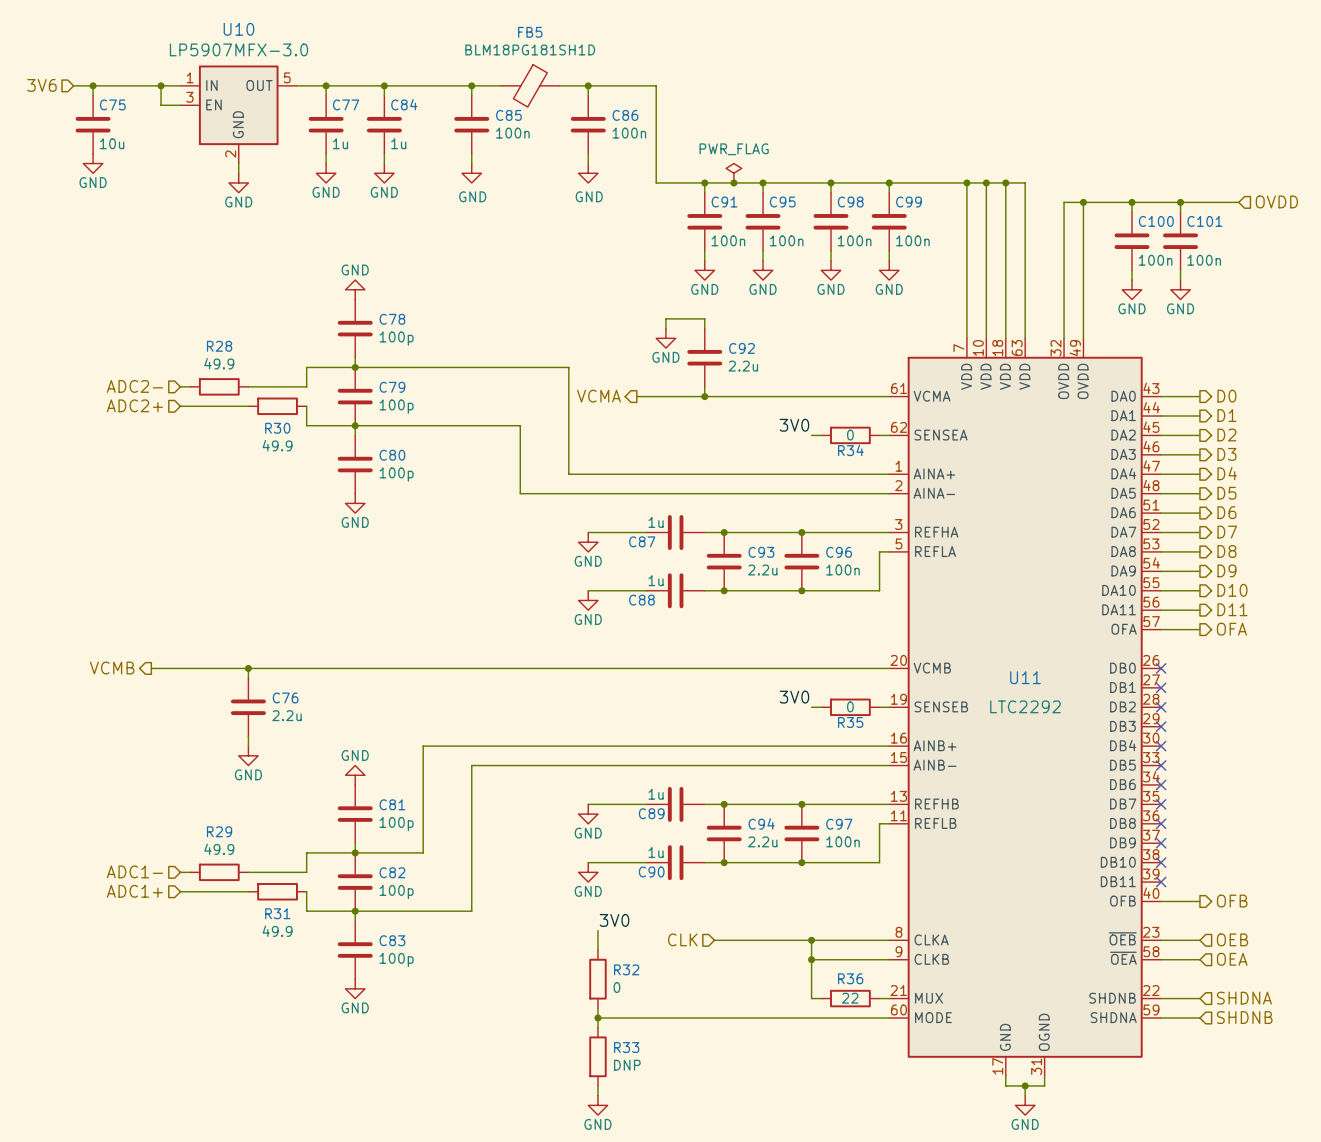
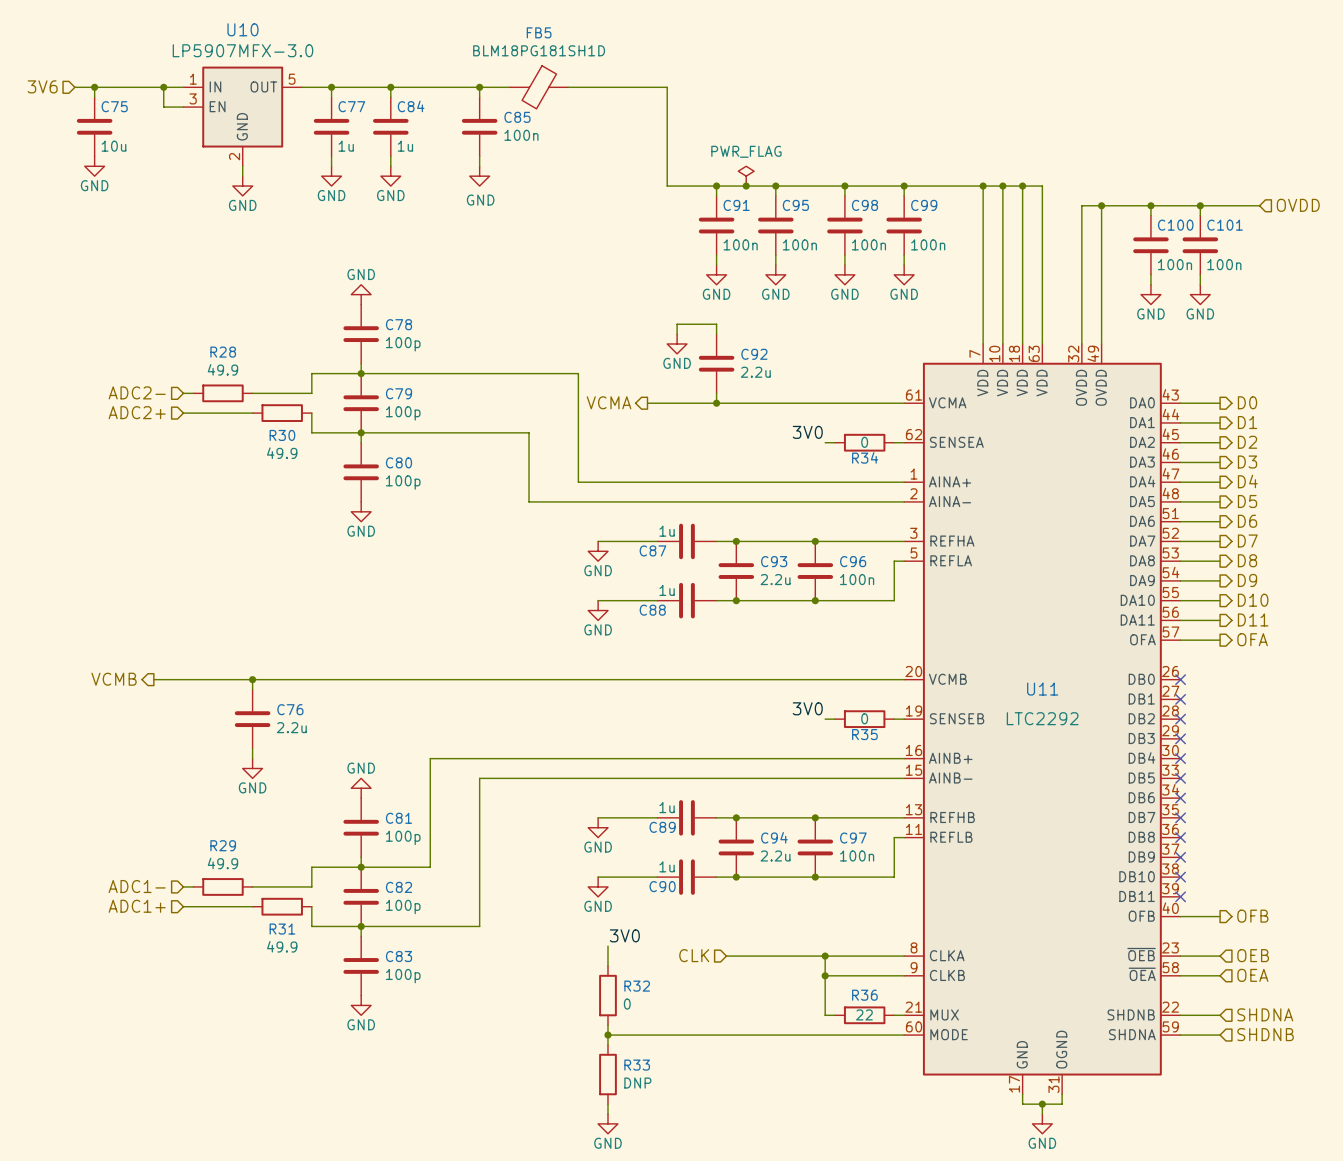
wire: (588, 85) (588, 95) -> none
junction: (588, 85) -> none
C86: 100n (588, 124) -> none
wire: (588, 153) (588, 163) -> none
power symbol: GND (588, 173) -> none

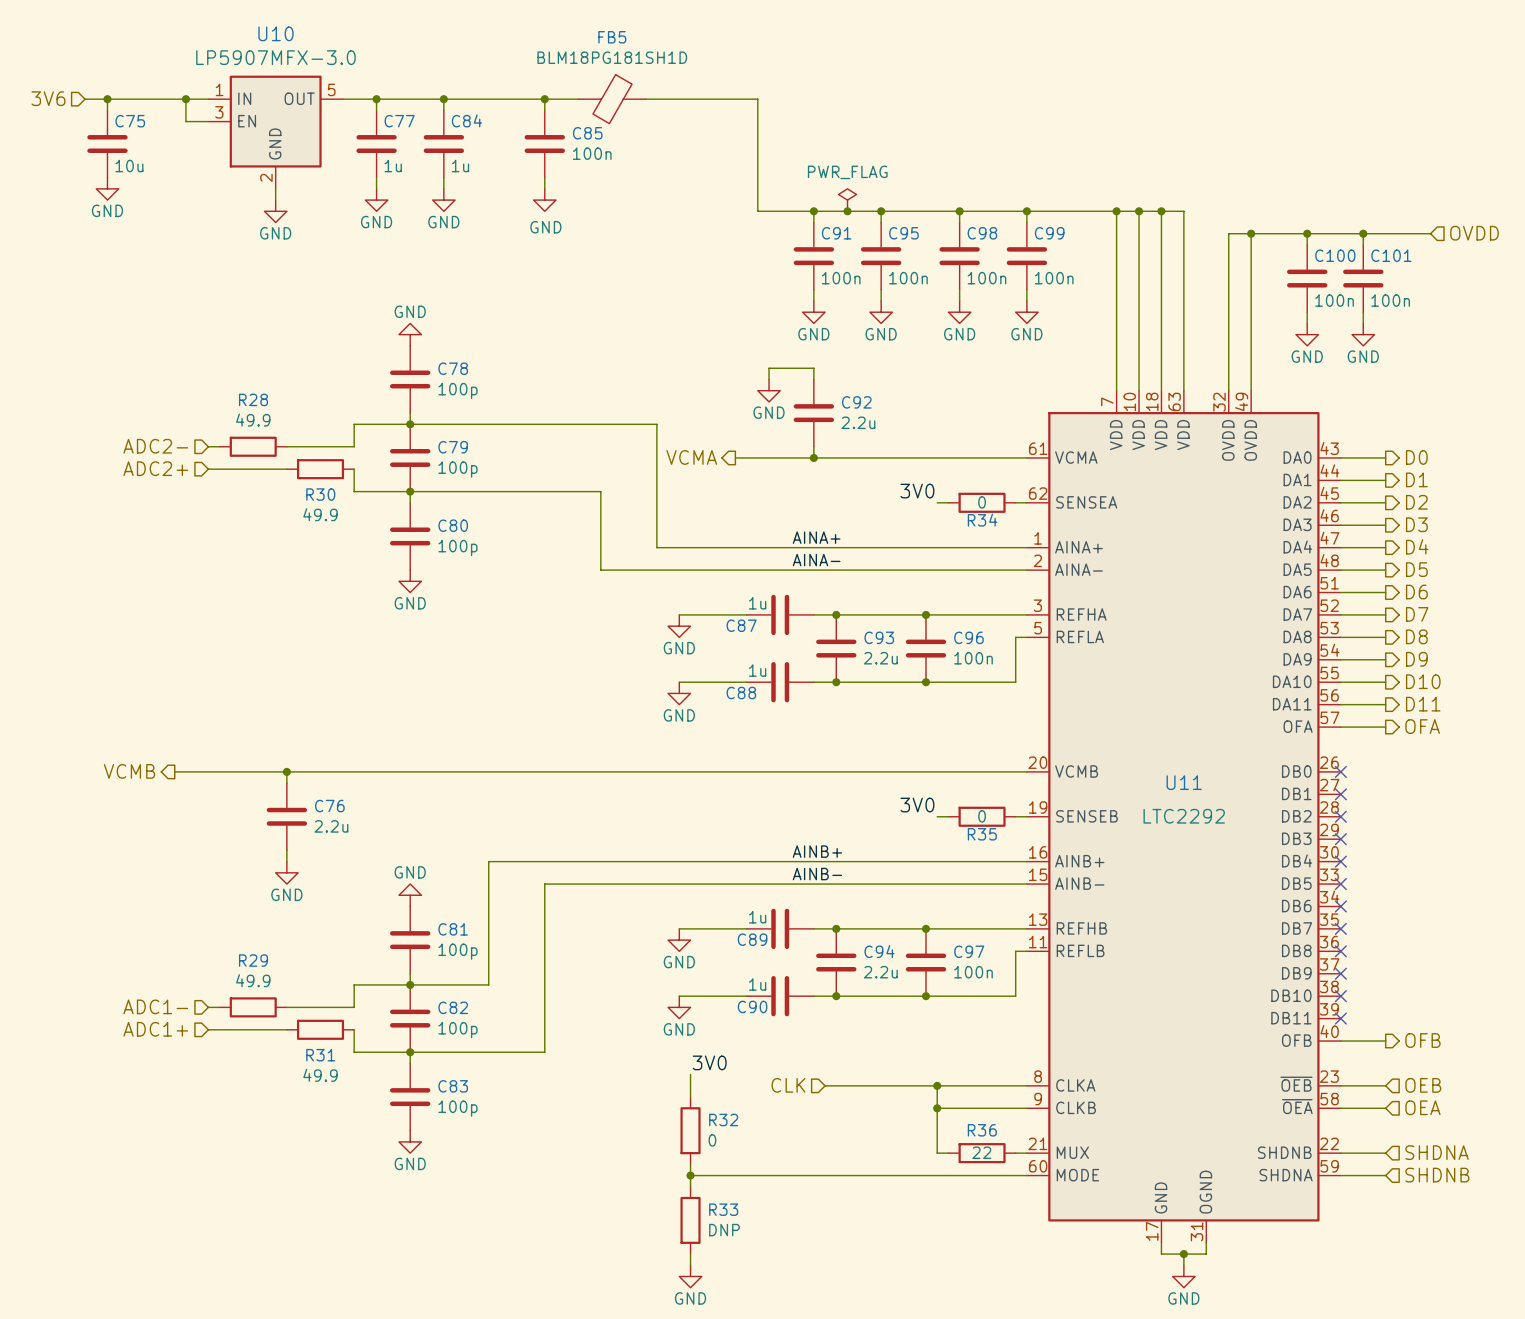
label: none -> AINA+ (816, 537)
label: none -> AINA- (816, 560)
label: none -> AINB+ (817, 851)
label: none -> AINB- (817, 874)

